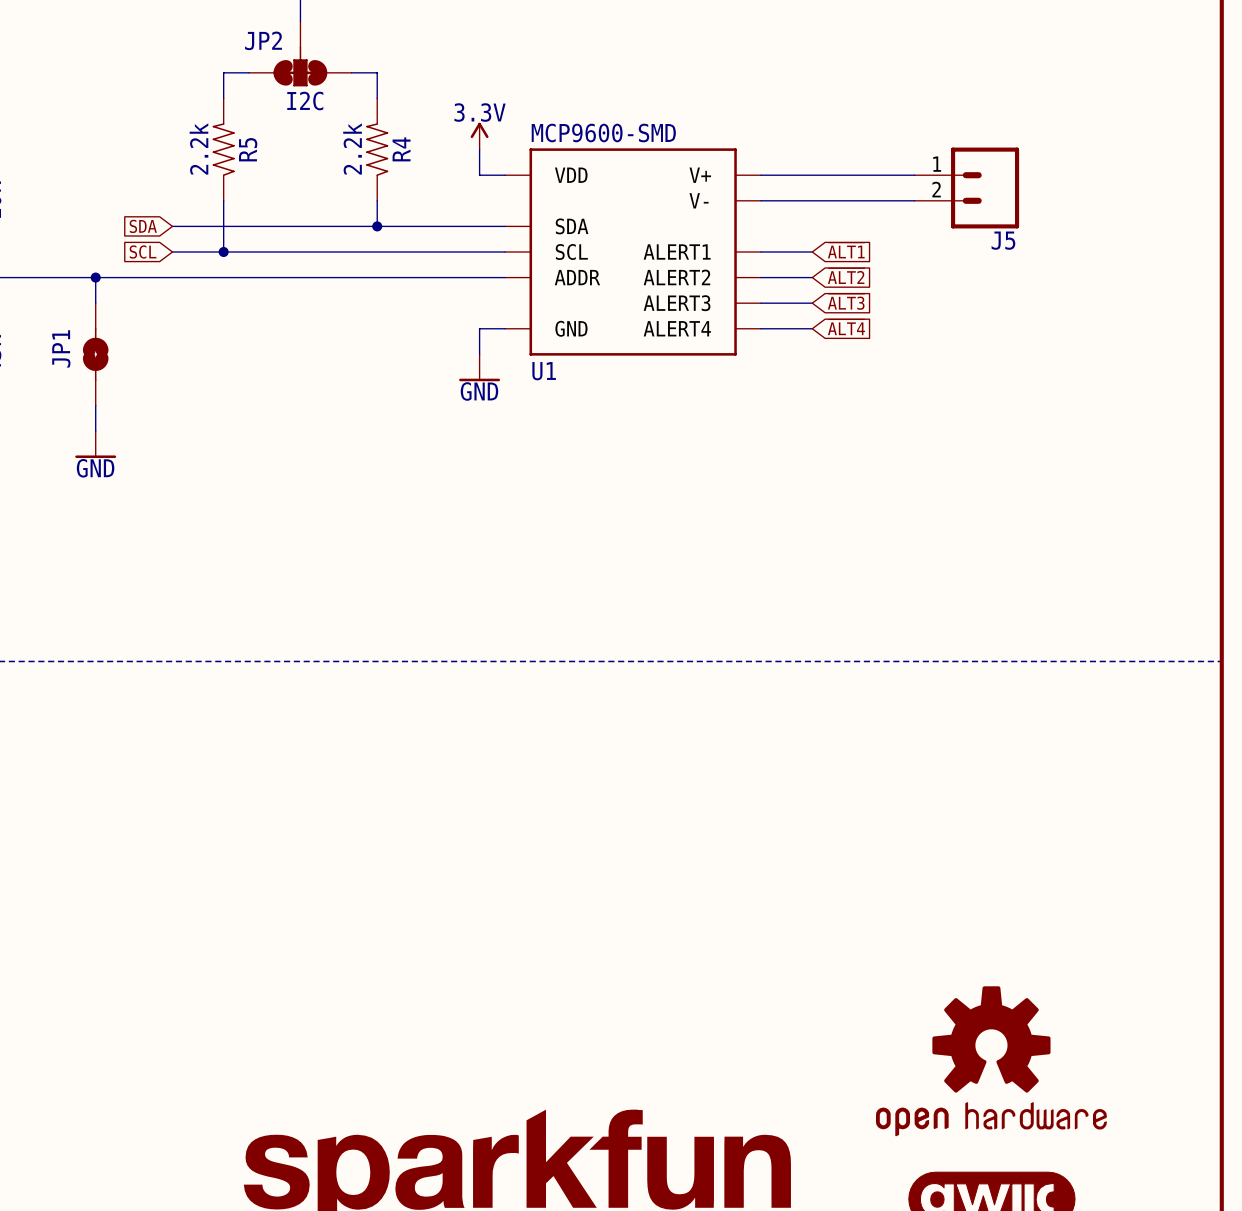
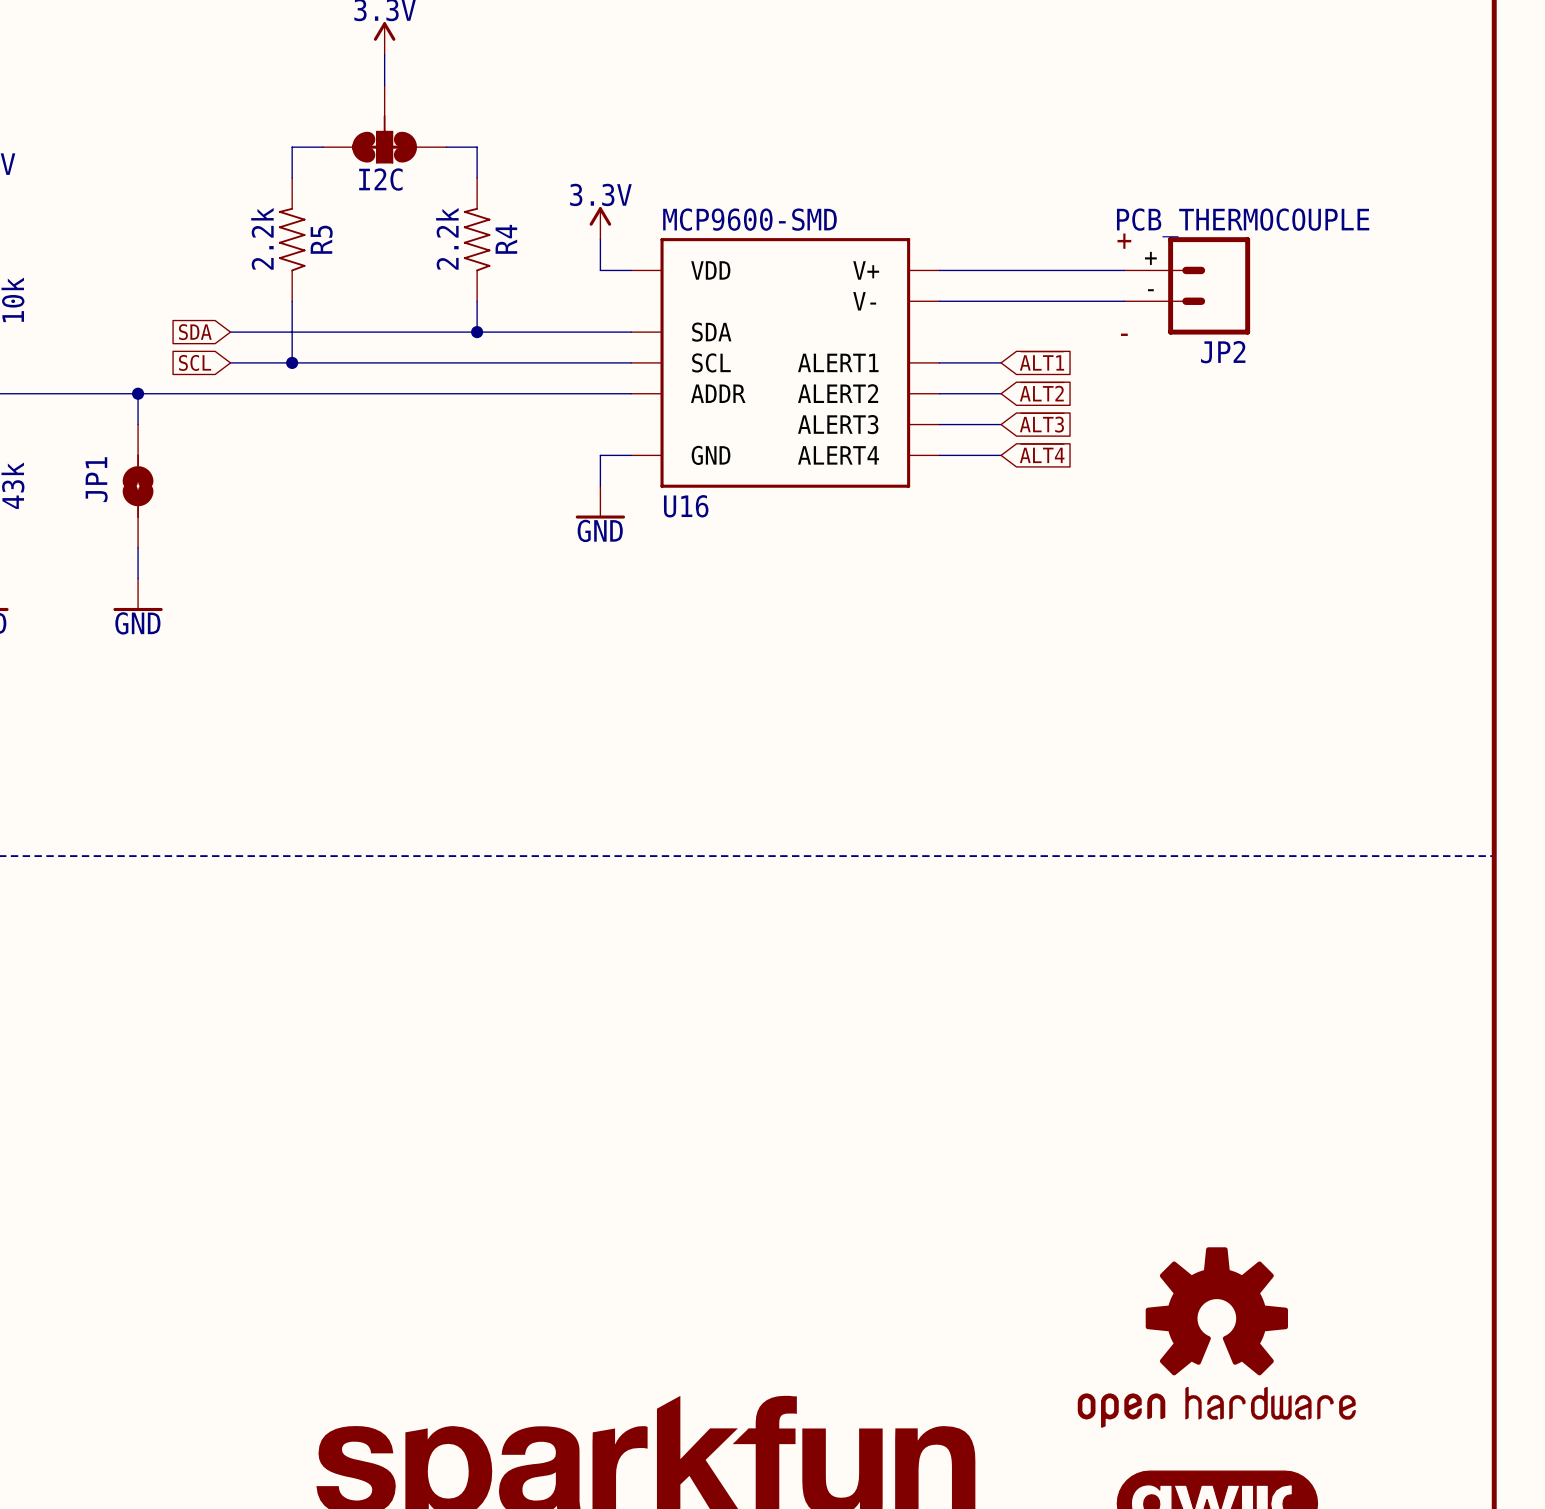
JP2 name: JP2 (263, 40) -> I2C (380, 179)
JP2 value: I2C (305, 101) -> none
J5 value: none -> PCB_THERMOCOUPLE (1243, 222)
J5 text: none -> + (1124, 241)
J5 pin number: 1 (937, 164) -> + (1150, 258)
J5 pin number: 2 (936, 189) -> - (1150, 290)
J5 text: none -> - (1124, 334)
J5 name: J5 (1003, 240) -> JP2 (1223, 352)
U1 name: U1 (544, 371) -> U16 (686, 506)

